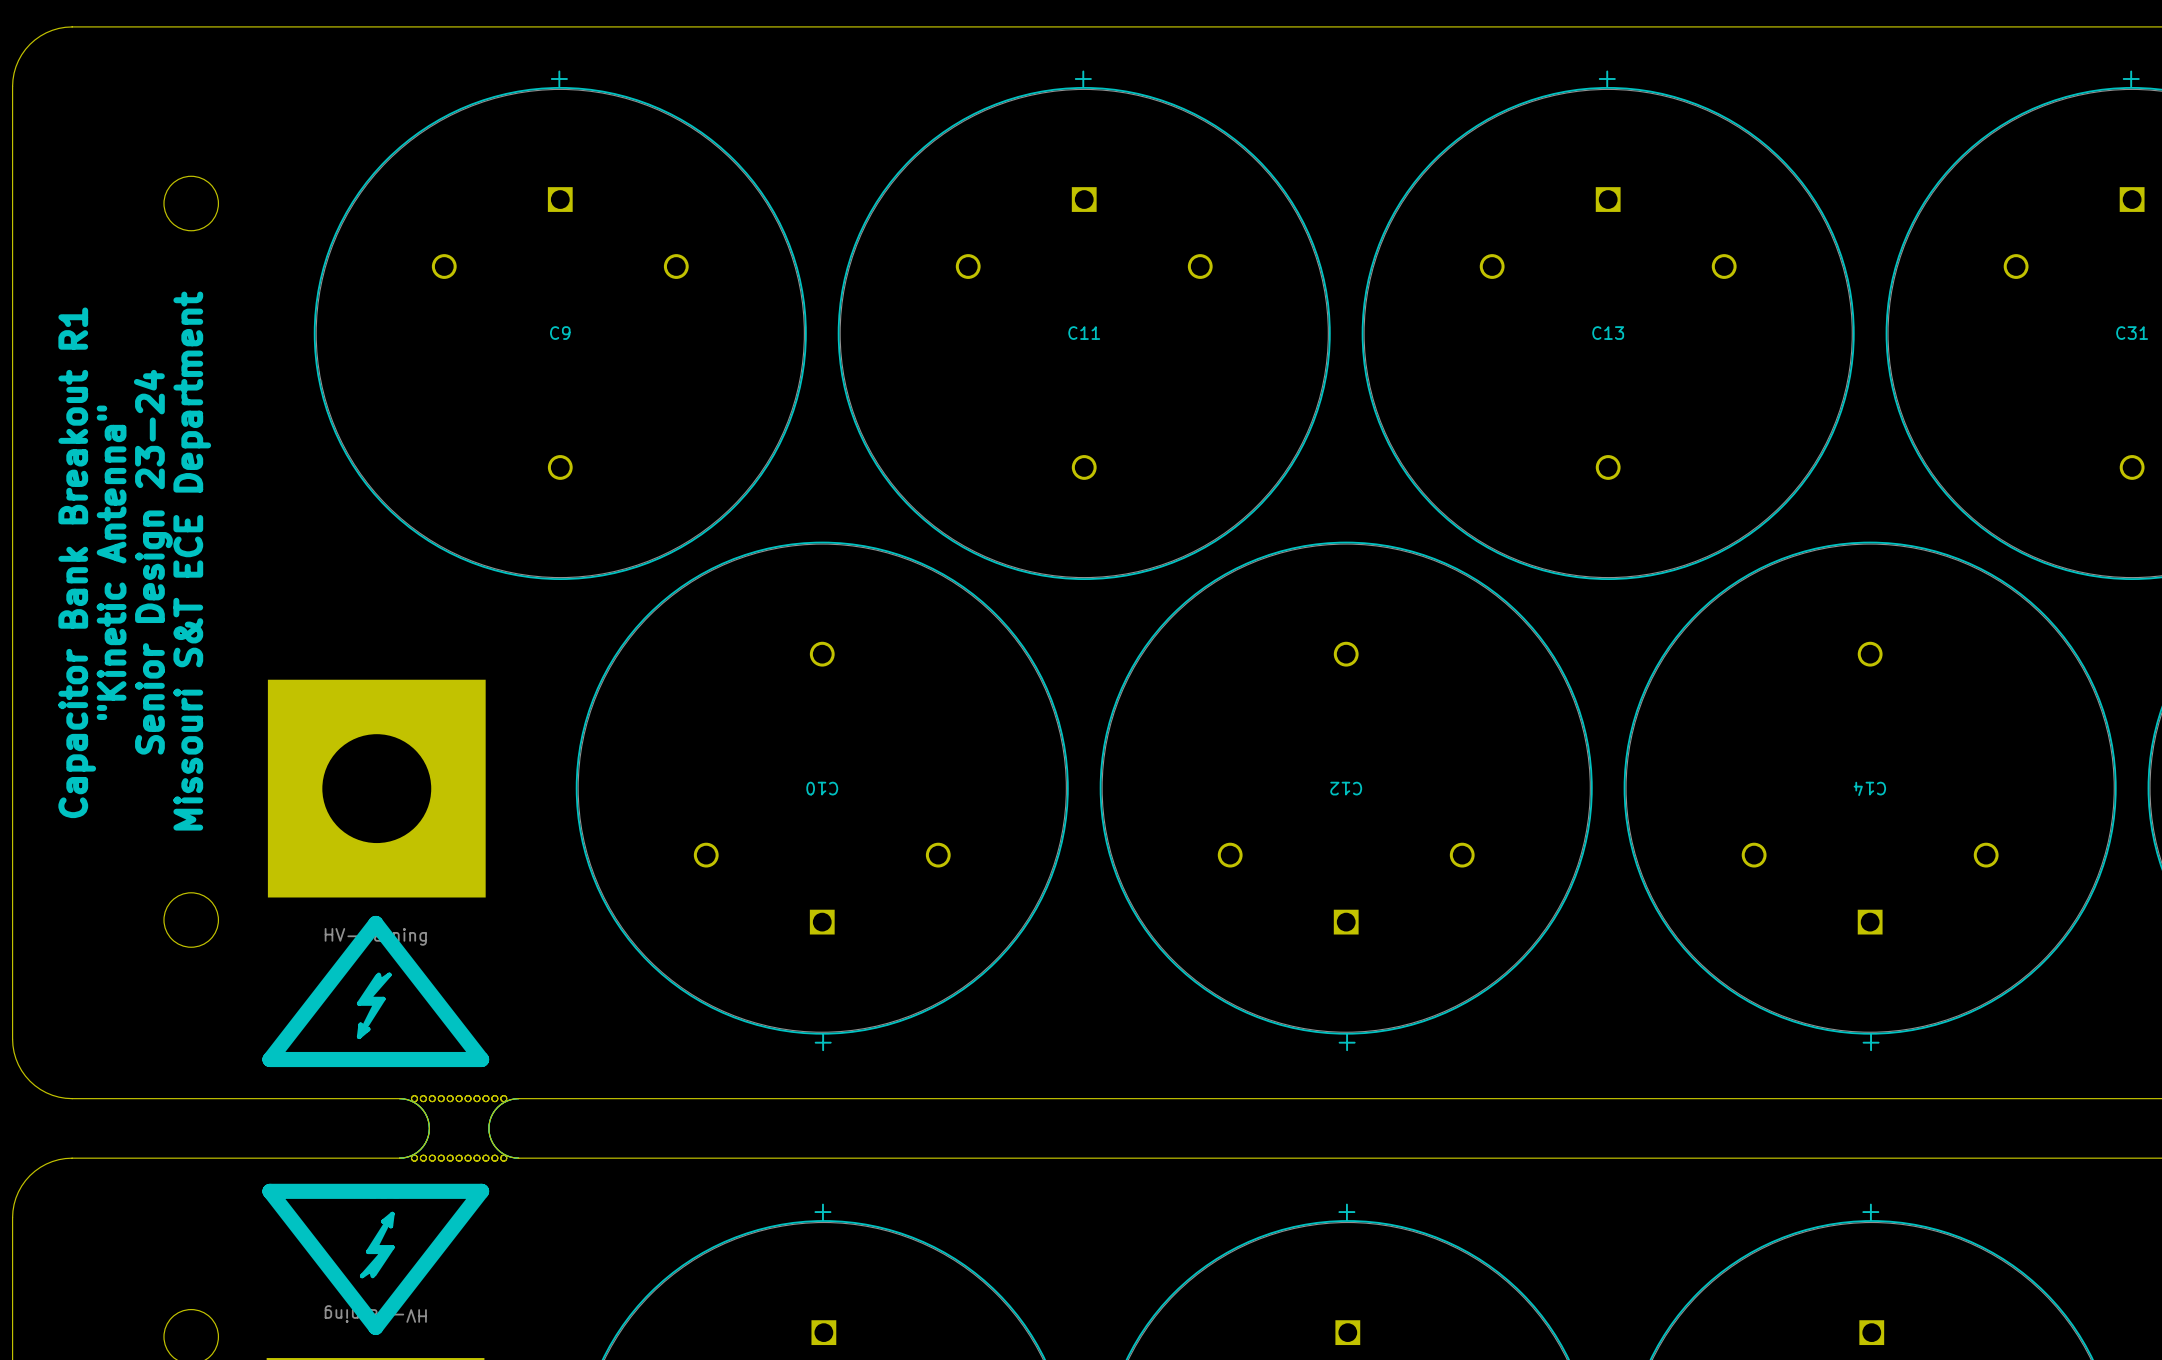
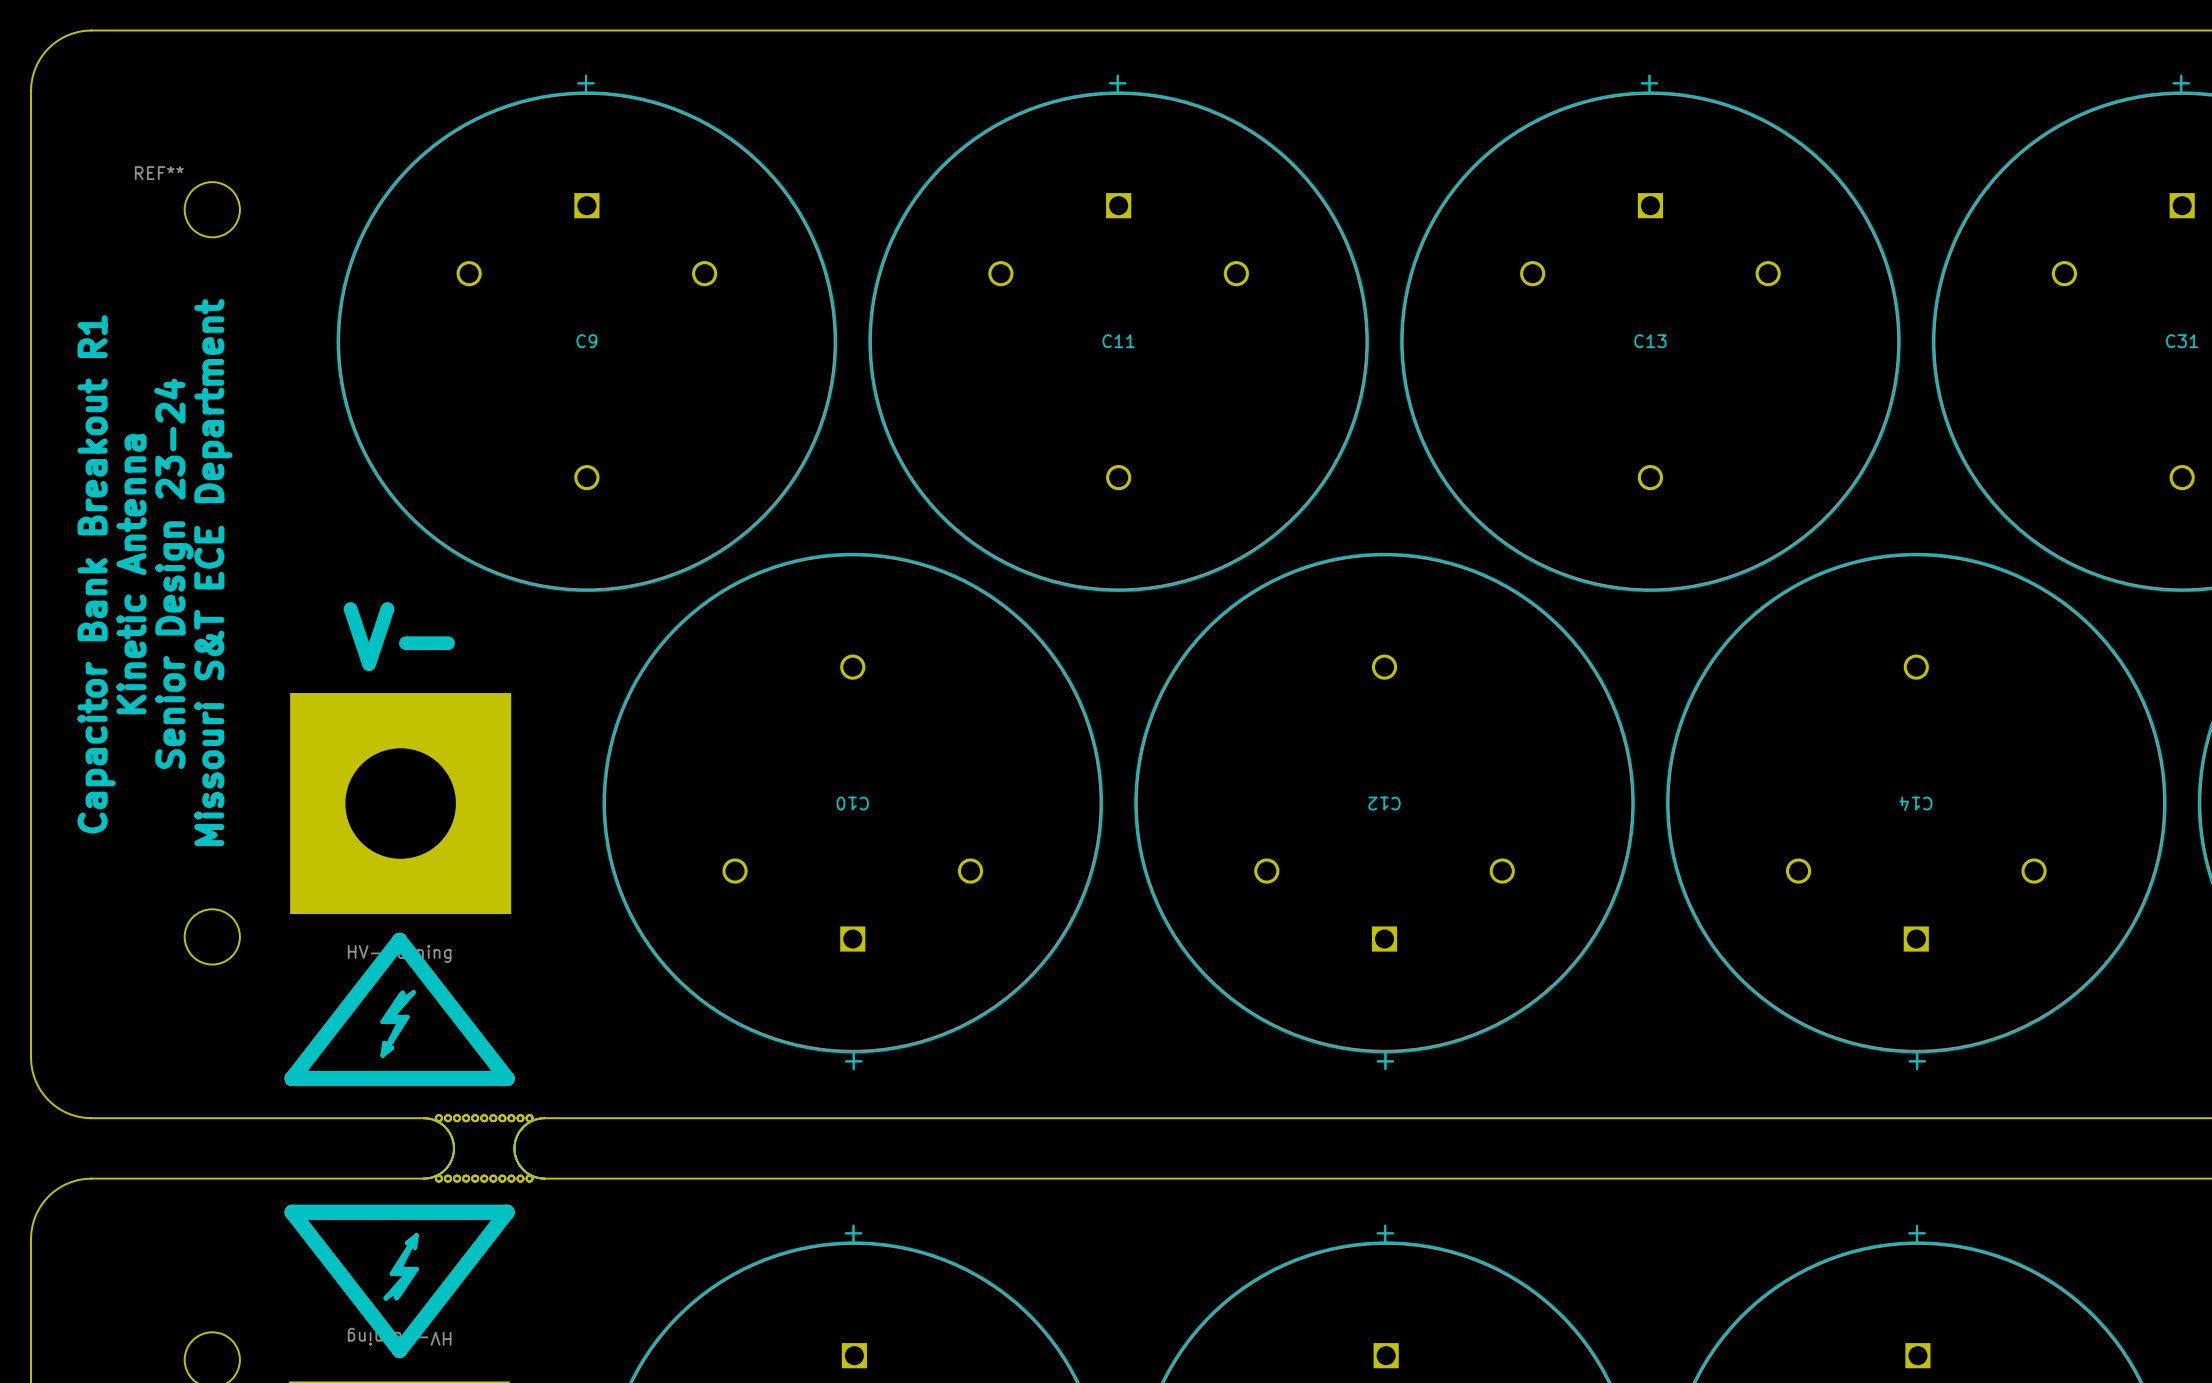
text: none -> REF** (159, 173)
text: "Kinetic Antenna" (111, 562) -> Kinetic Antenna (131, 574)
text: none -> V- (399, 636)

